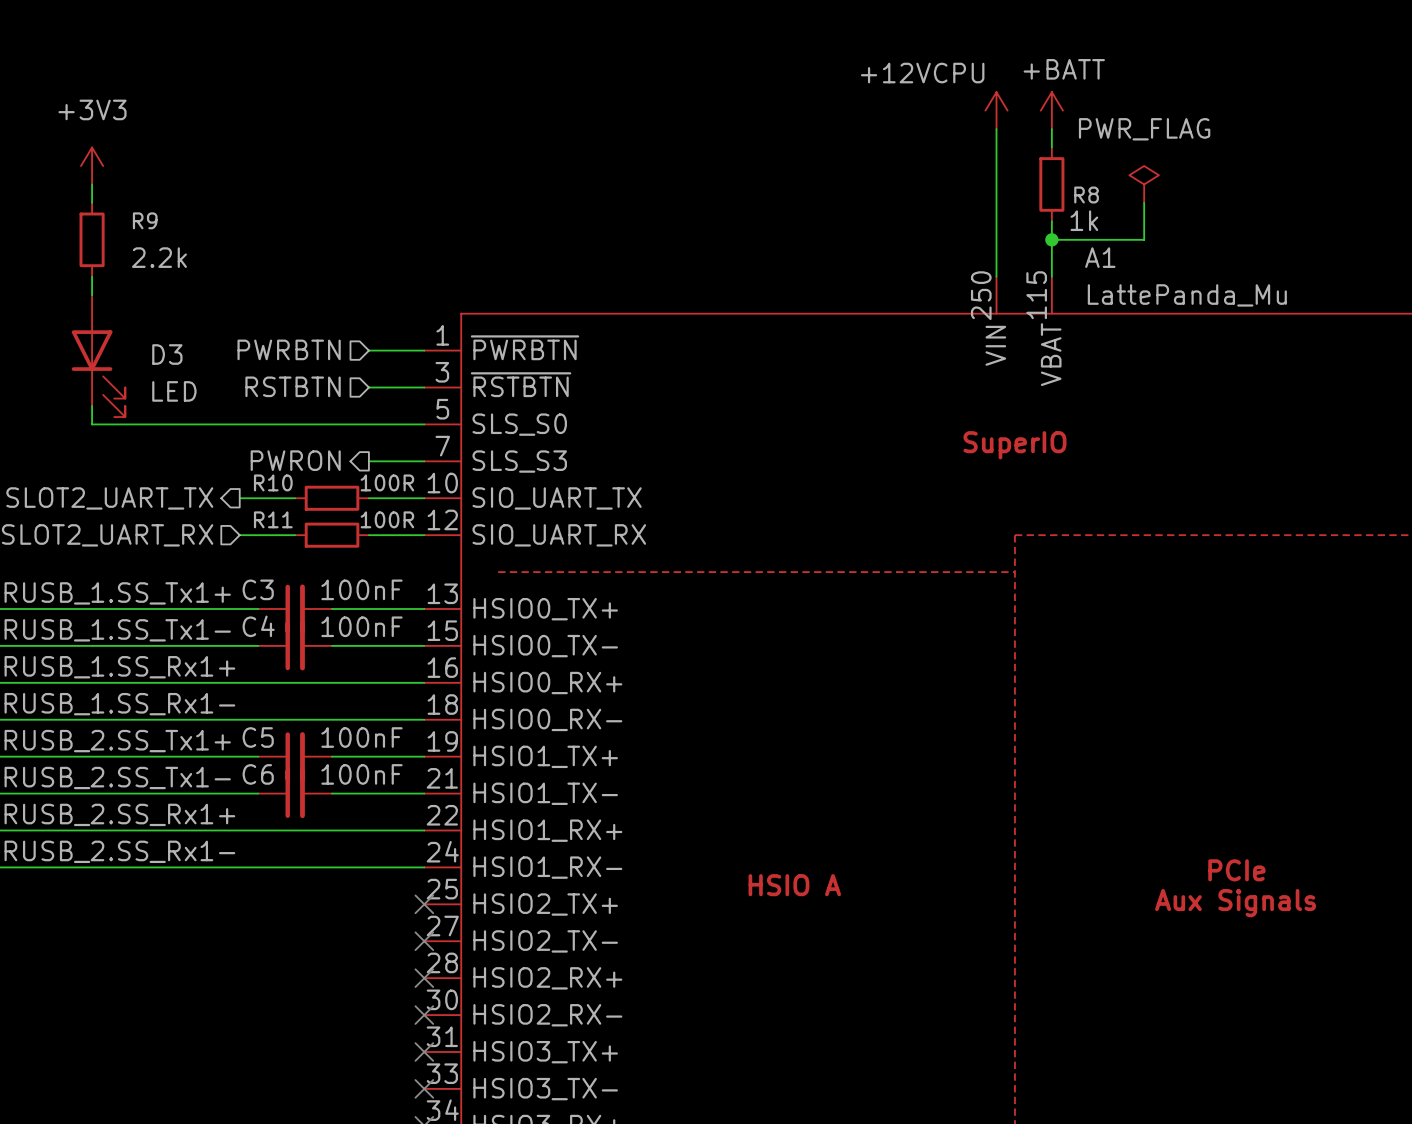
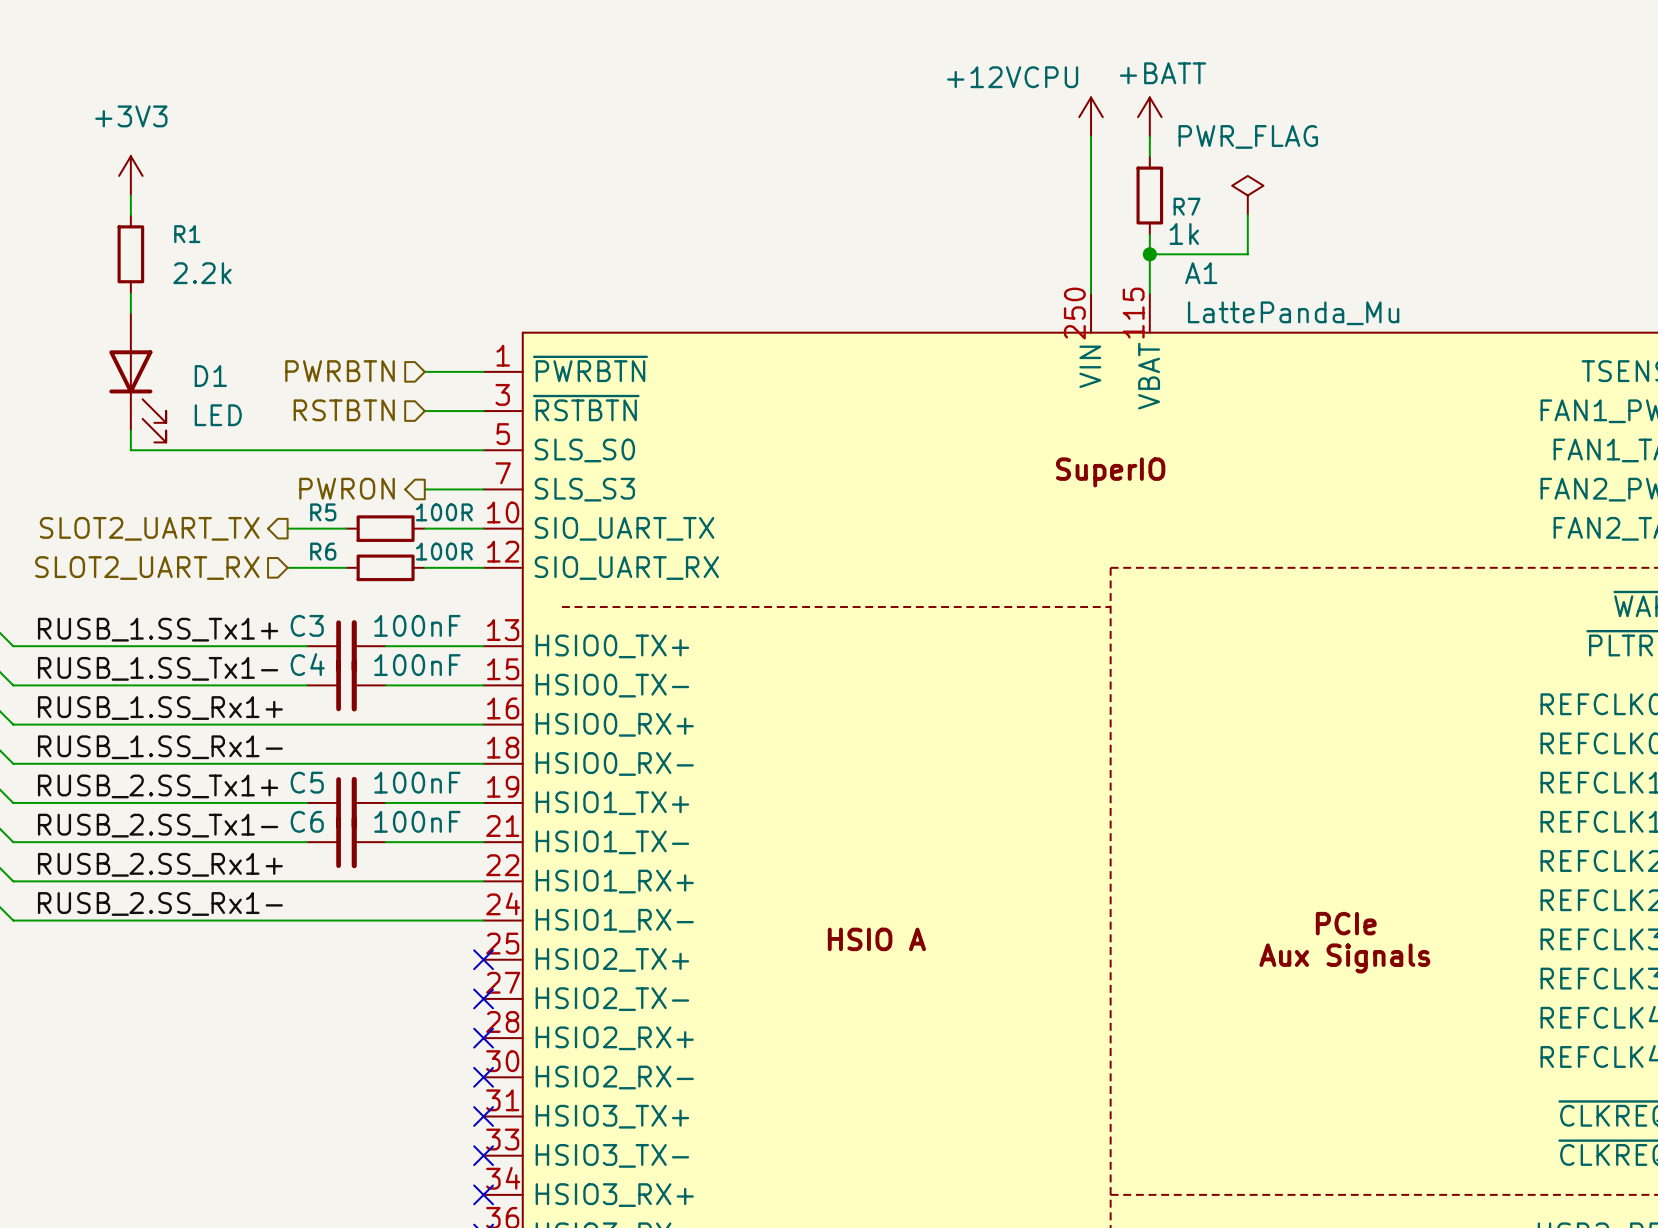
R8 name: R8 (1086, 194) -> R7 (1187, 206)
R9 name: R9 (145, 220) -> R1 (187, 234)
D3 name: D3 (167, 354) -> D1 (210, 376)
R10 name: R10 (273, 482) -> R5 (323, 512)
R11 name: R11 (273, 519) -> R6 (323, 551)

